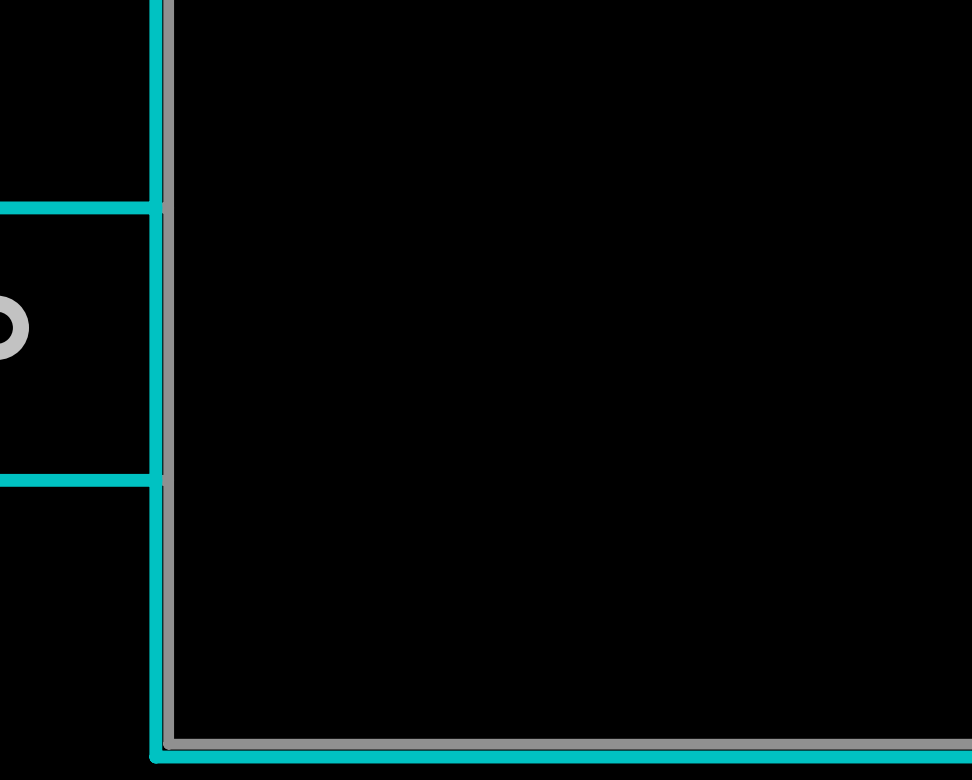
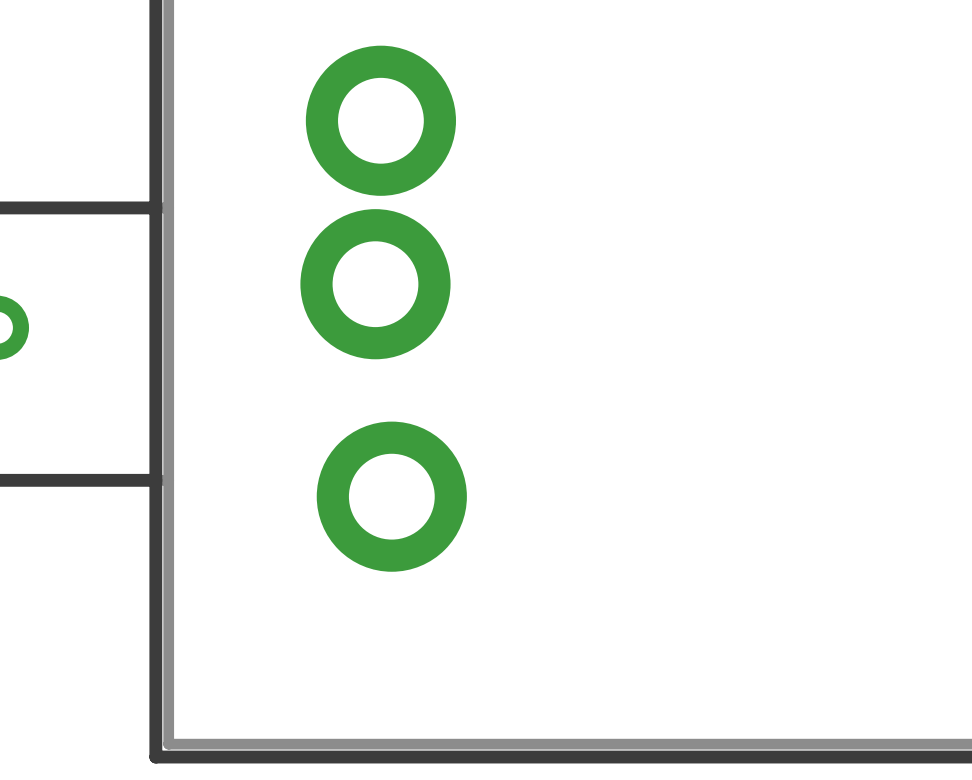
via: none -> (380, 120)
via: none -> (375, 284)
via: none -> (391, 496)

